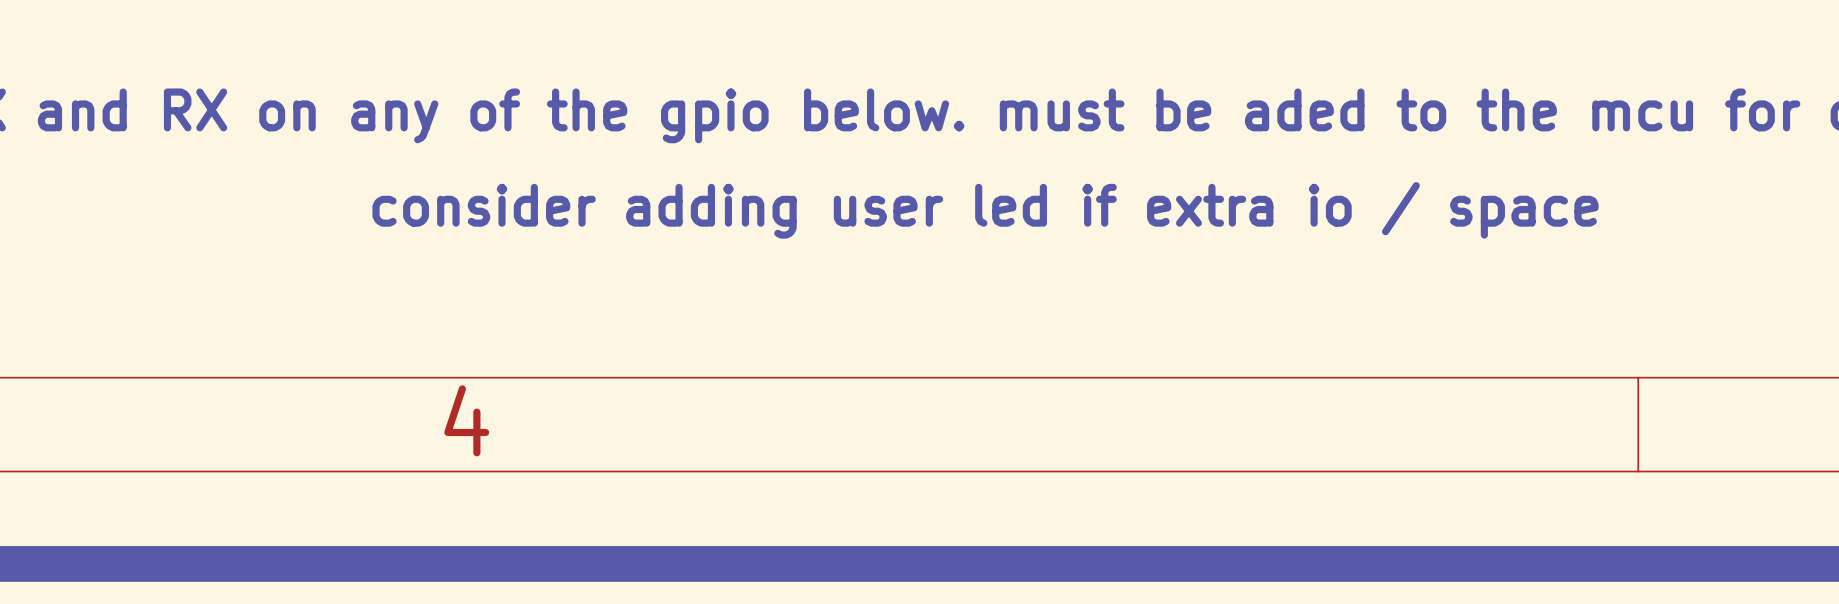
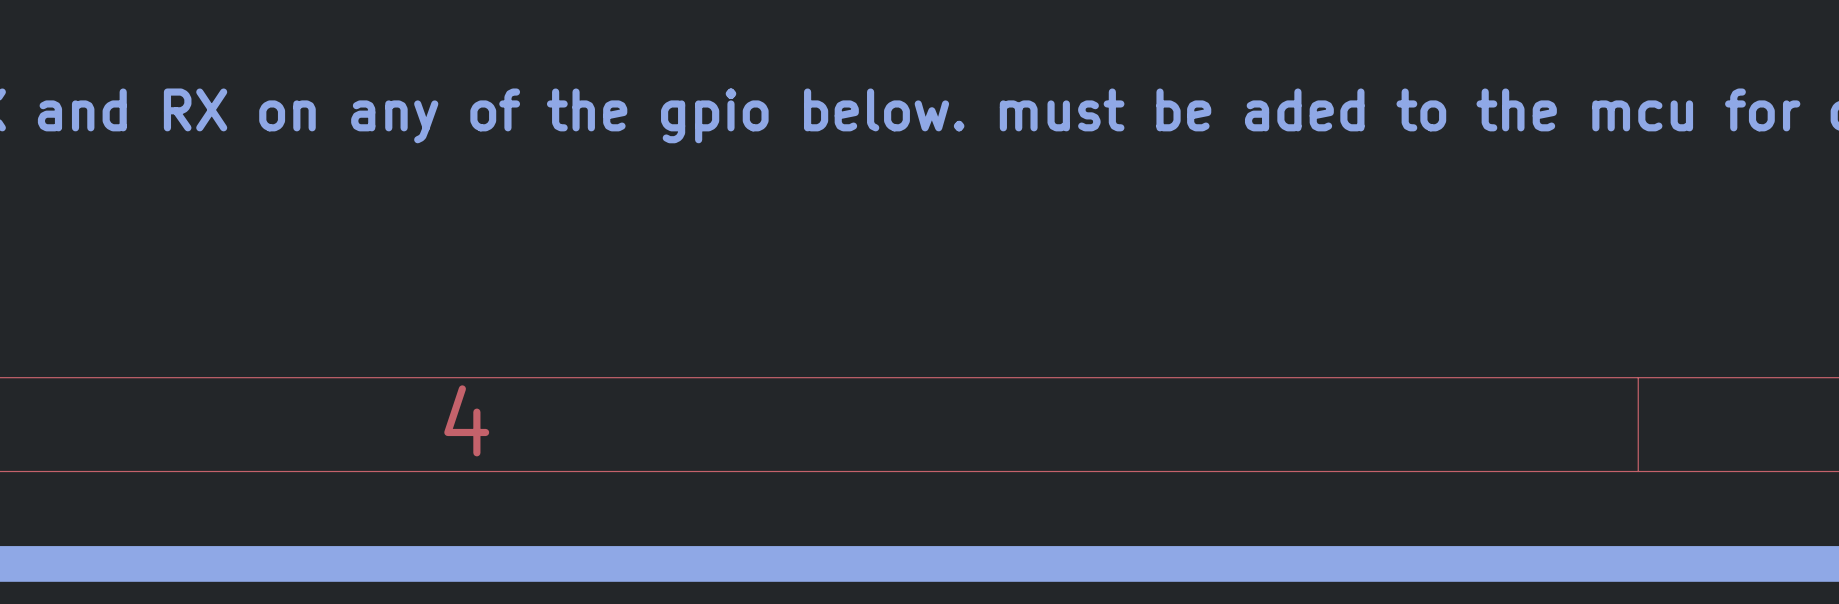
text: consider adding user led if extra io / space (985, 210) -> none

